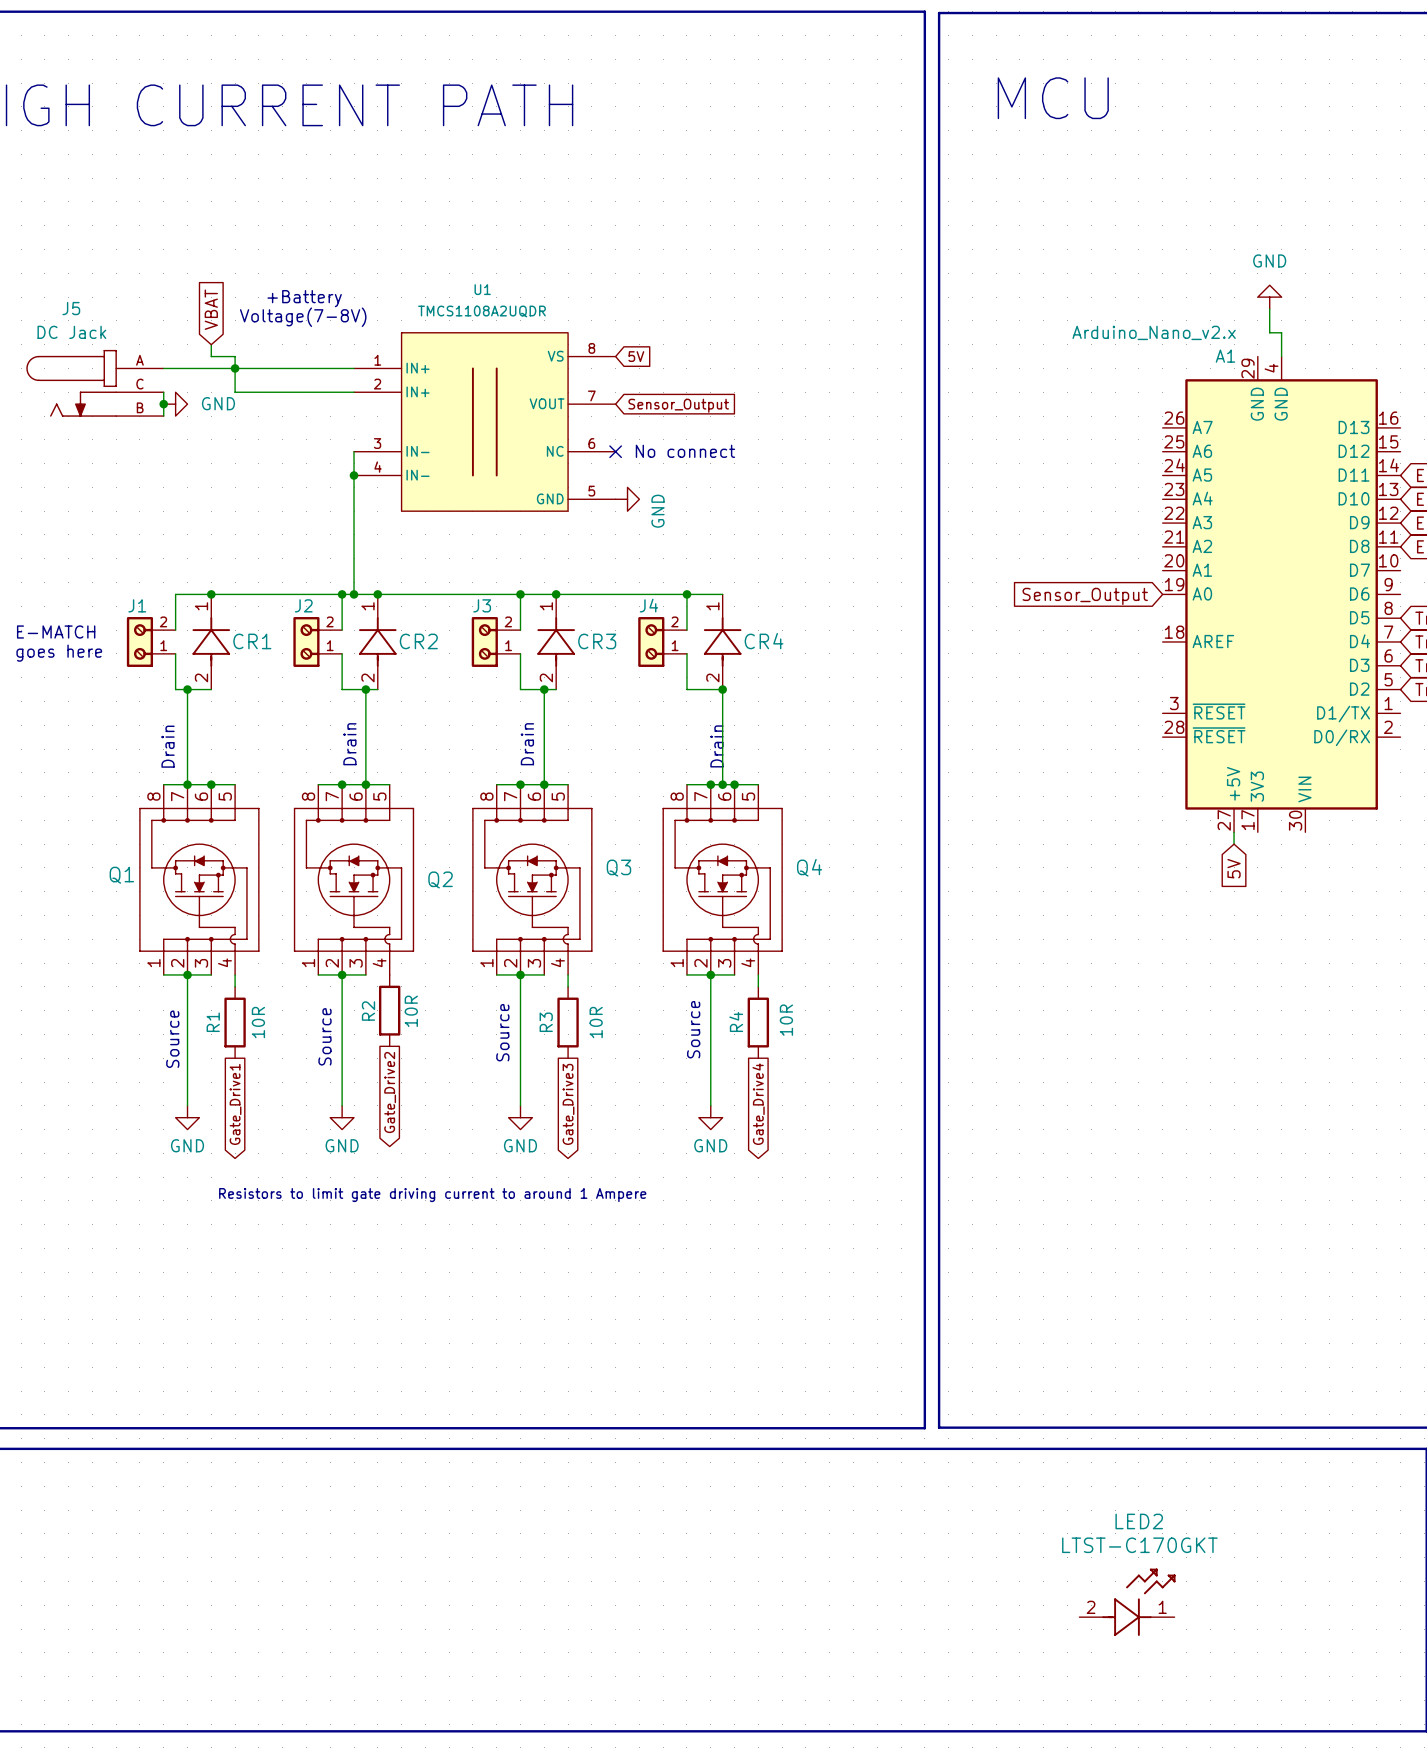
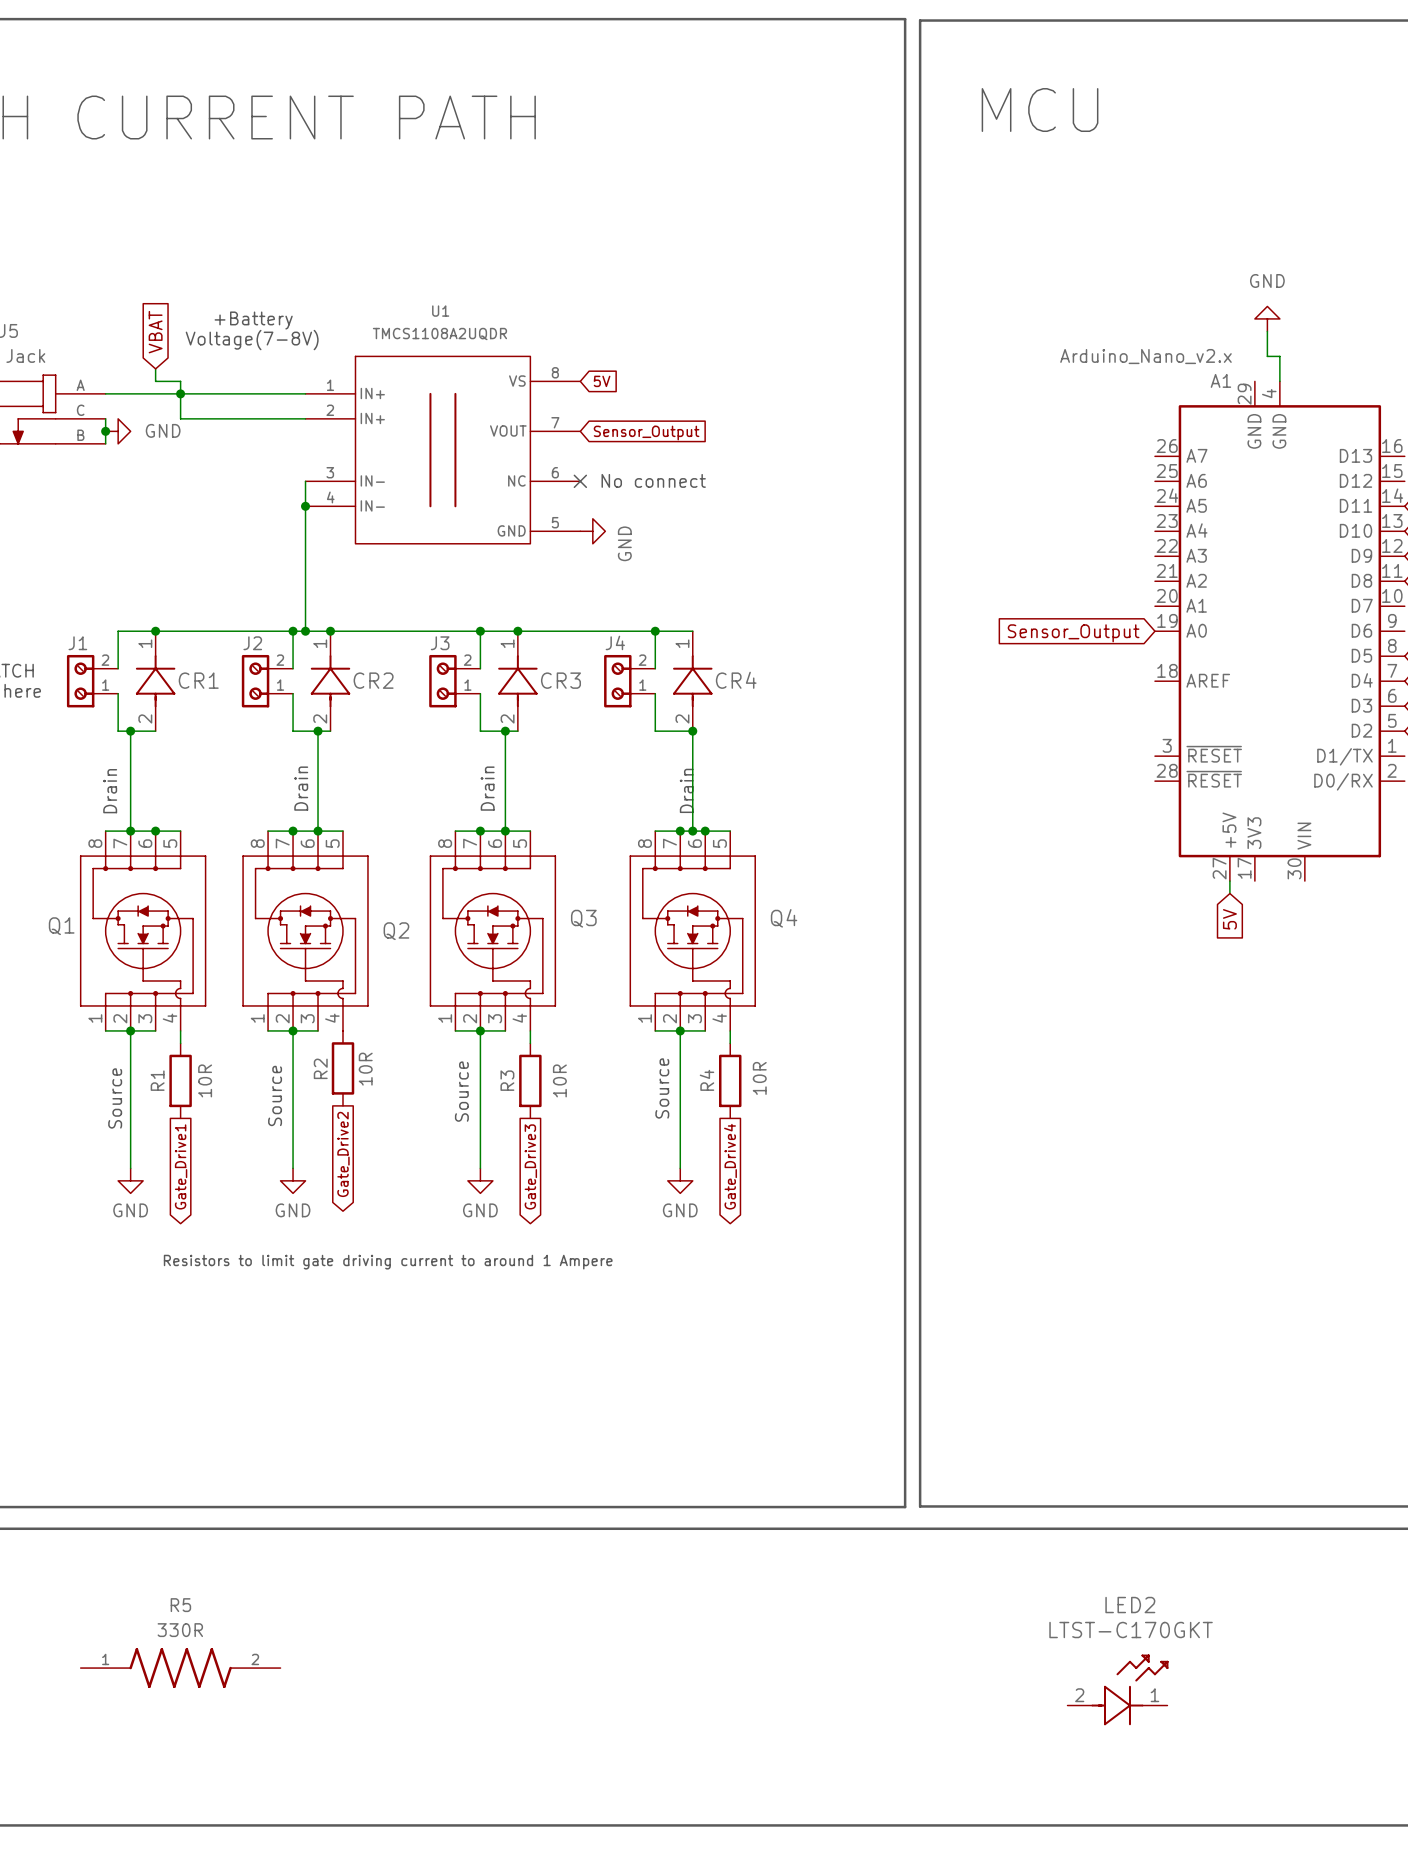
R5: none -> 330R (180, 1668)

